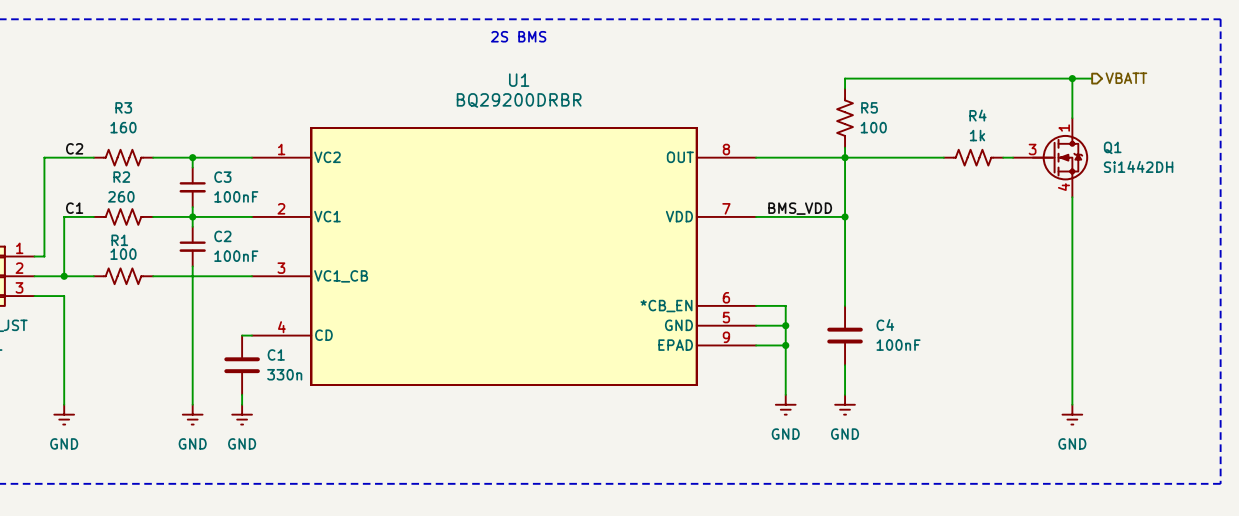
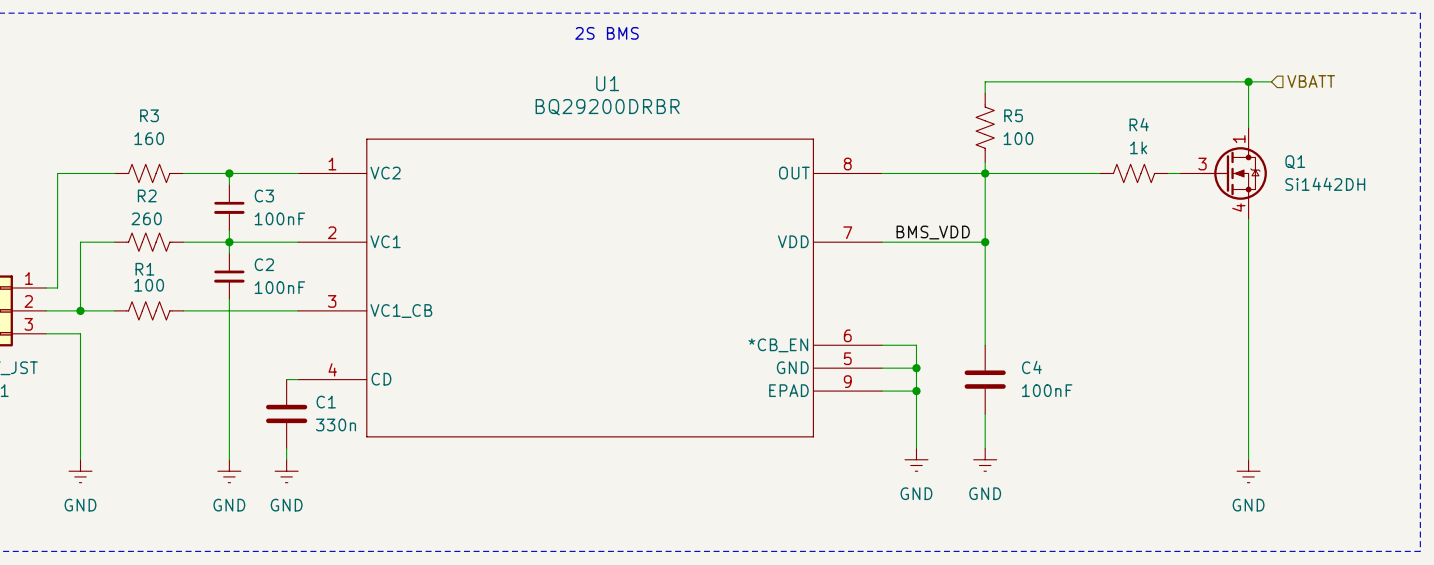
hierarchical label shape: output (1126, 78) -> input (1311, 81)
U1 symbol: [251, 127, 757, 386] -> [298, 138, 883, 438]
label: C2 (74, 148) -> none
label: C1 (74, 208) -> none

